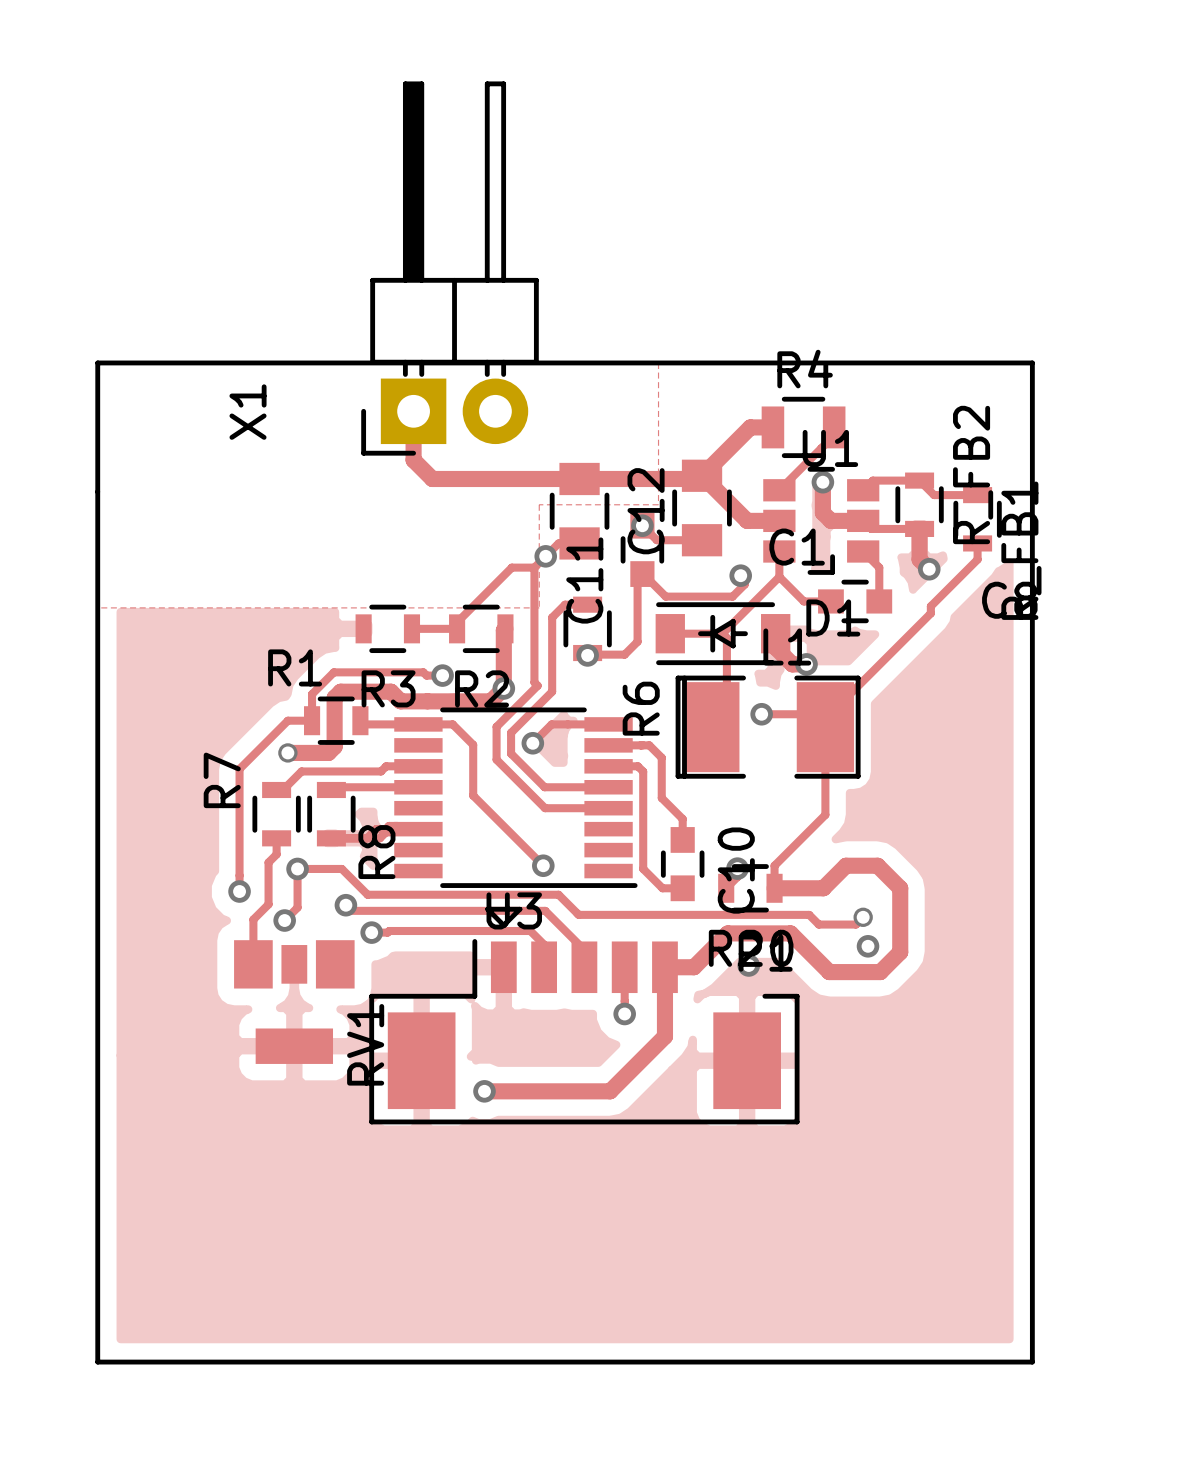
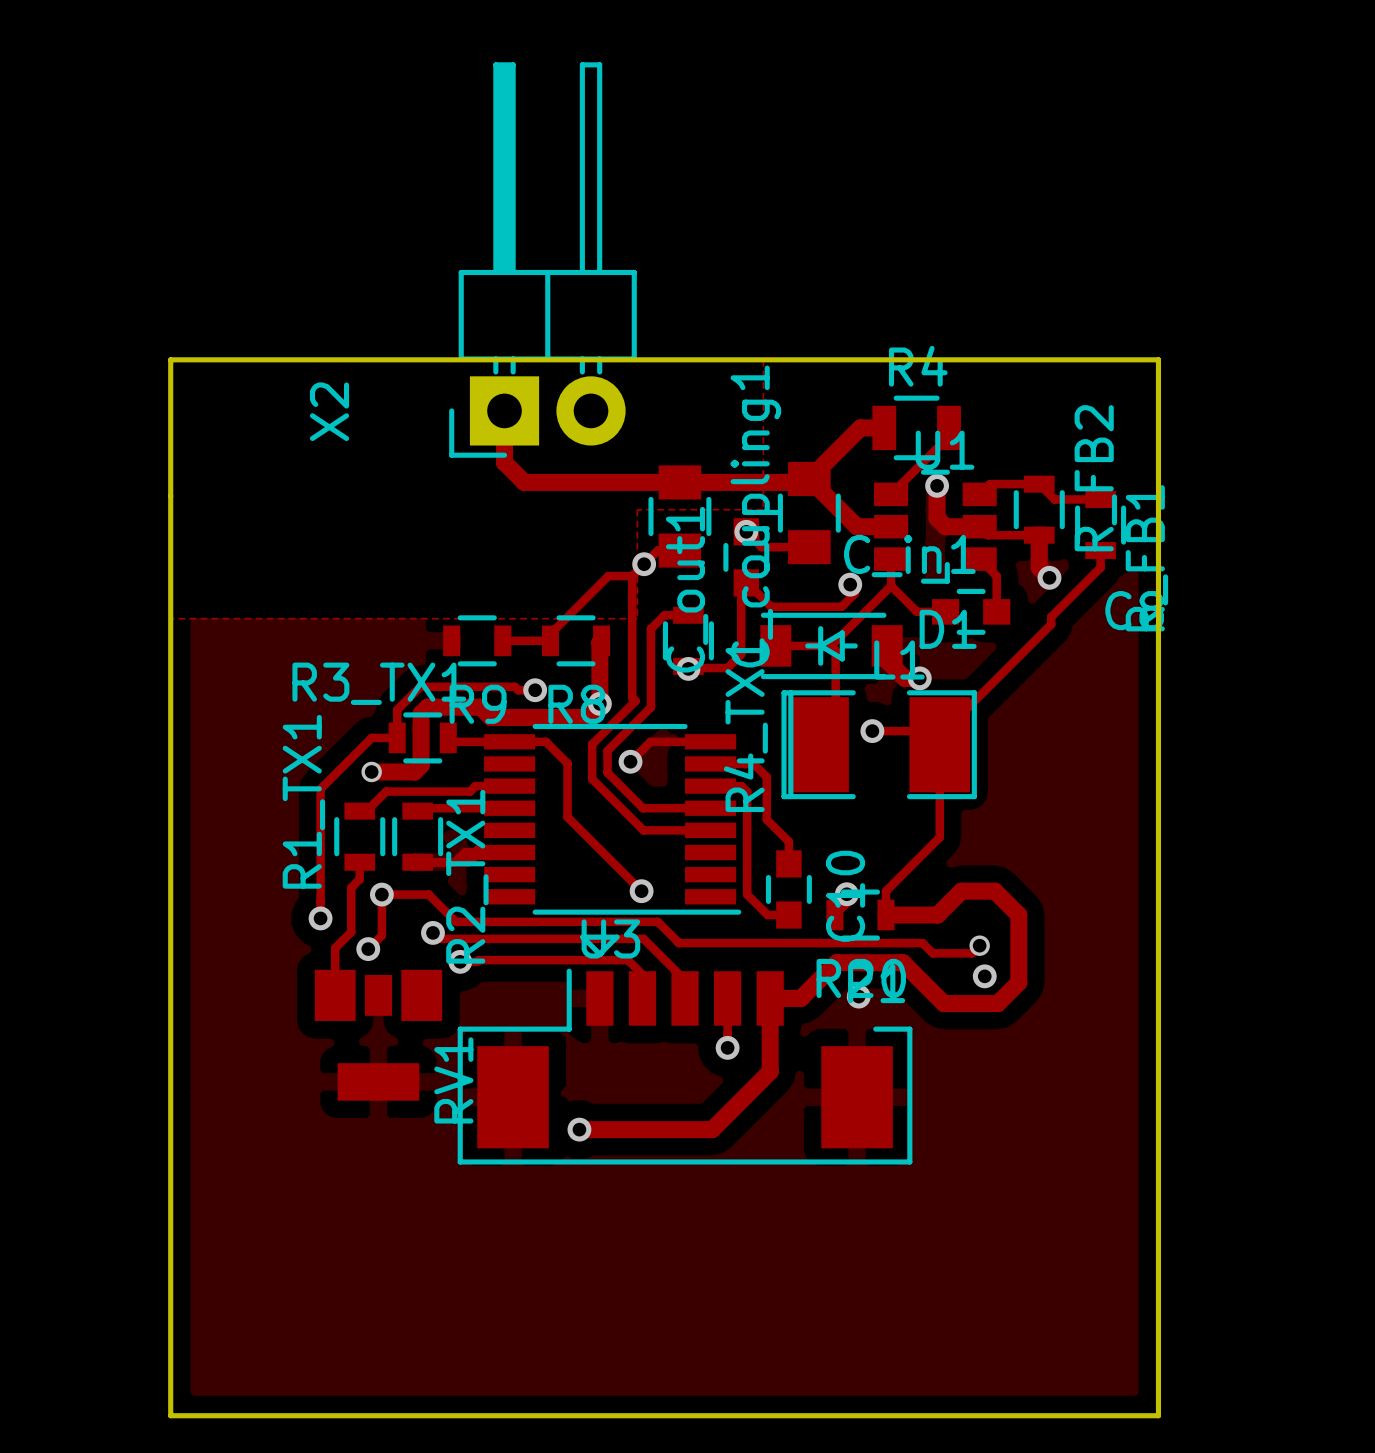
X1 name: X1 (248, 412) -> X2 (329, 411)
C12 name: C12 (646, 511) -> C_coupling1 (755, 516)
C1 name: C1 (797, 547) -> C_in1 (909, 556)
C11 name: C11 (584, 580) -> C_out1 (687, 589)
R1 name: R1 (295, 667) -> R3_TX1 (379, 683)
R3 name: R3 (388, 688) -> R9 (478, 704)
R2 name: R2 (482, 688) -> R8 (576, 704)
R6 name: R6 (641, 708) -> R4_TX1 (745, 725)
R7 name: R7 (222, 780) -> R1_TX1 (303, 801)
R8 name: R8 (376, 852) -> R2_TX1 (467, 876)

